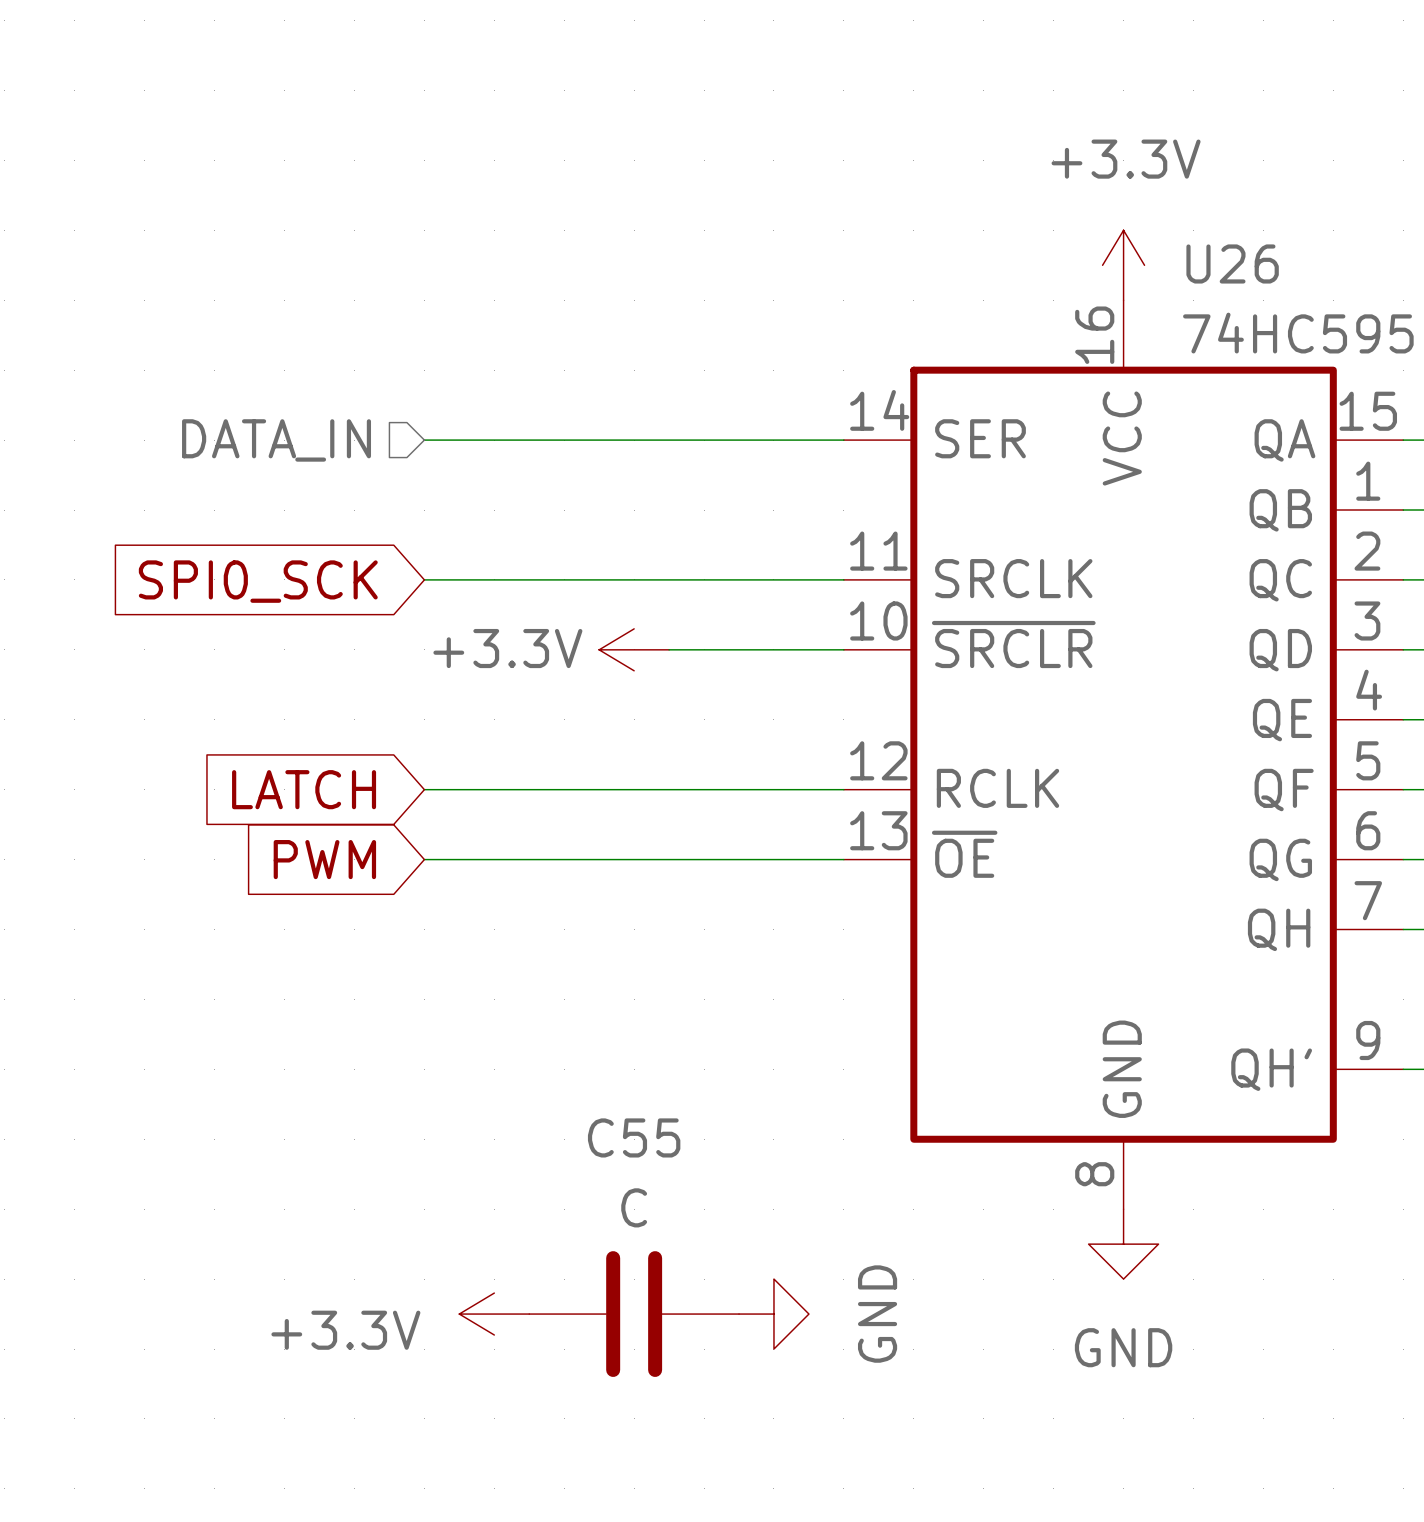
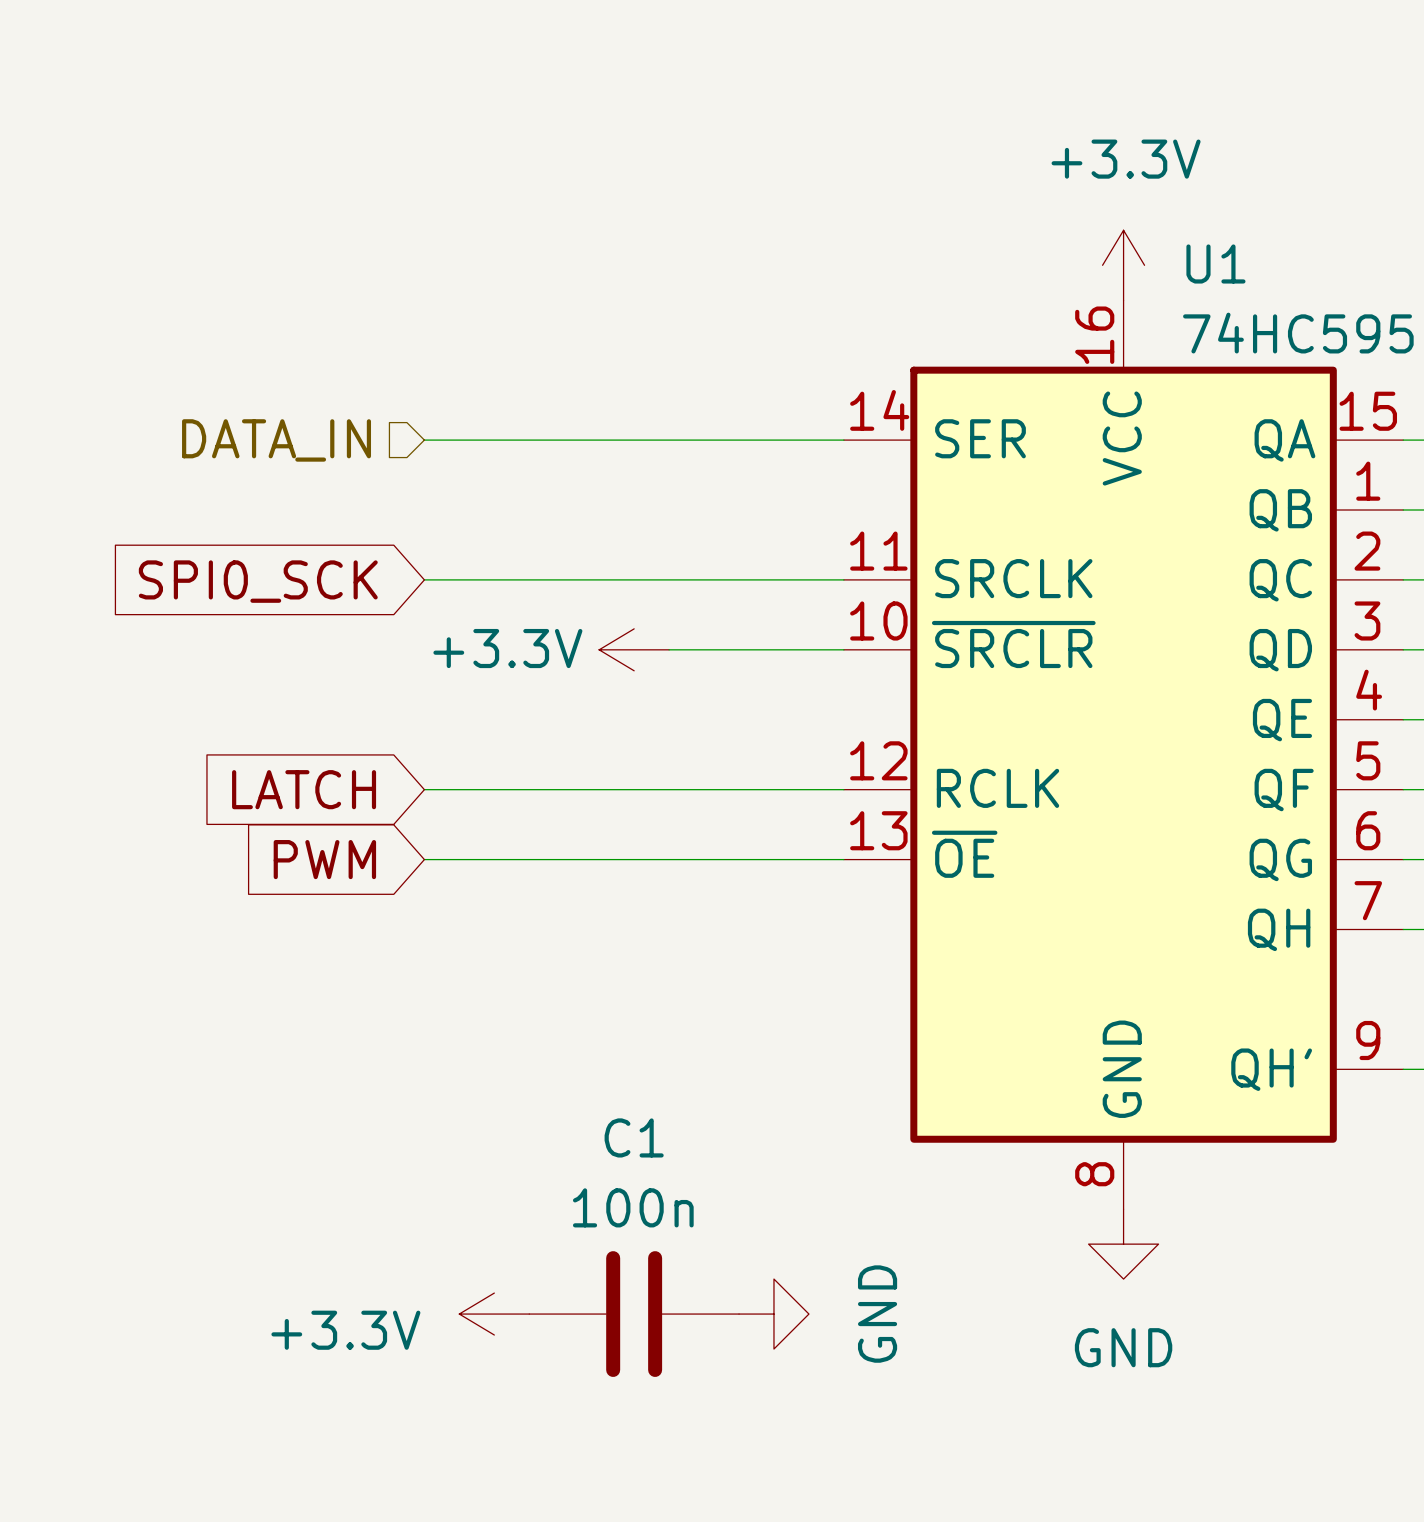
U26 name: U26 (1232, 263) -> U1 (1215, 263)
C55 name: C55 (634, 1137) -> C1 (634, 1137)
C55 value: C (634, 1207) -> 100n (633, 1207)

